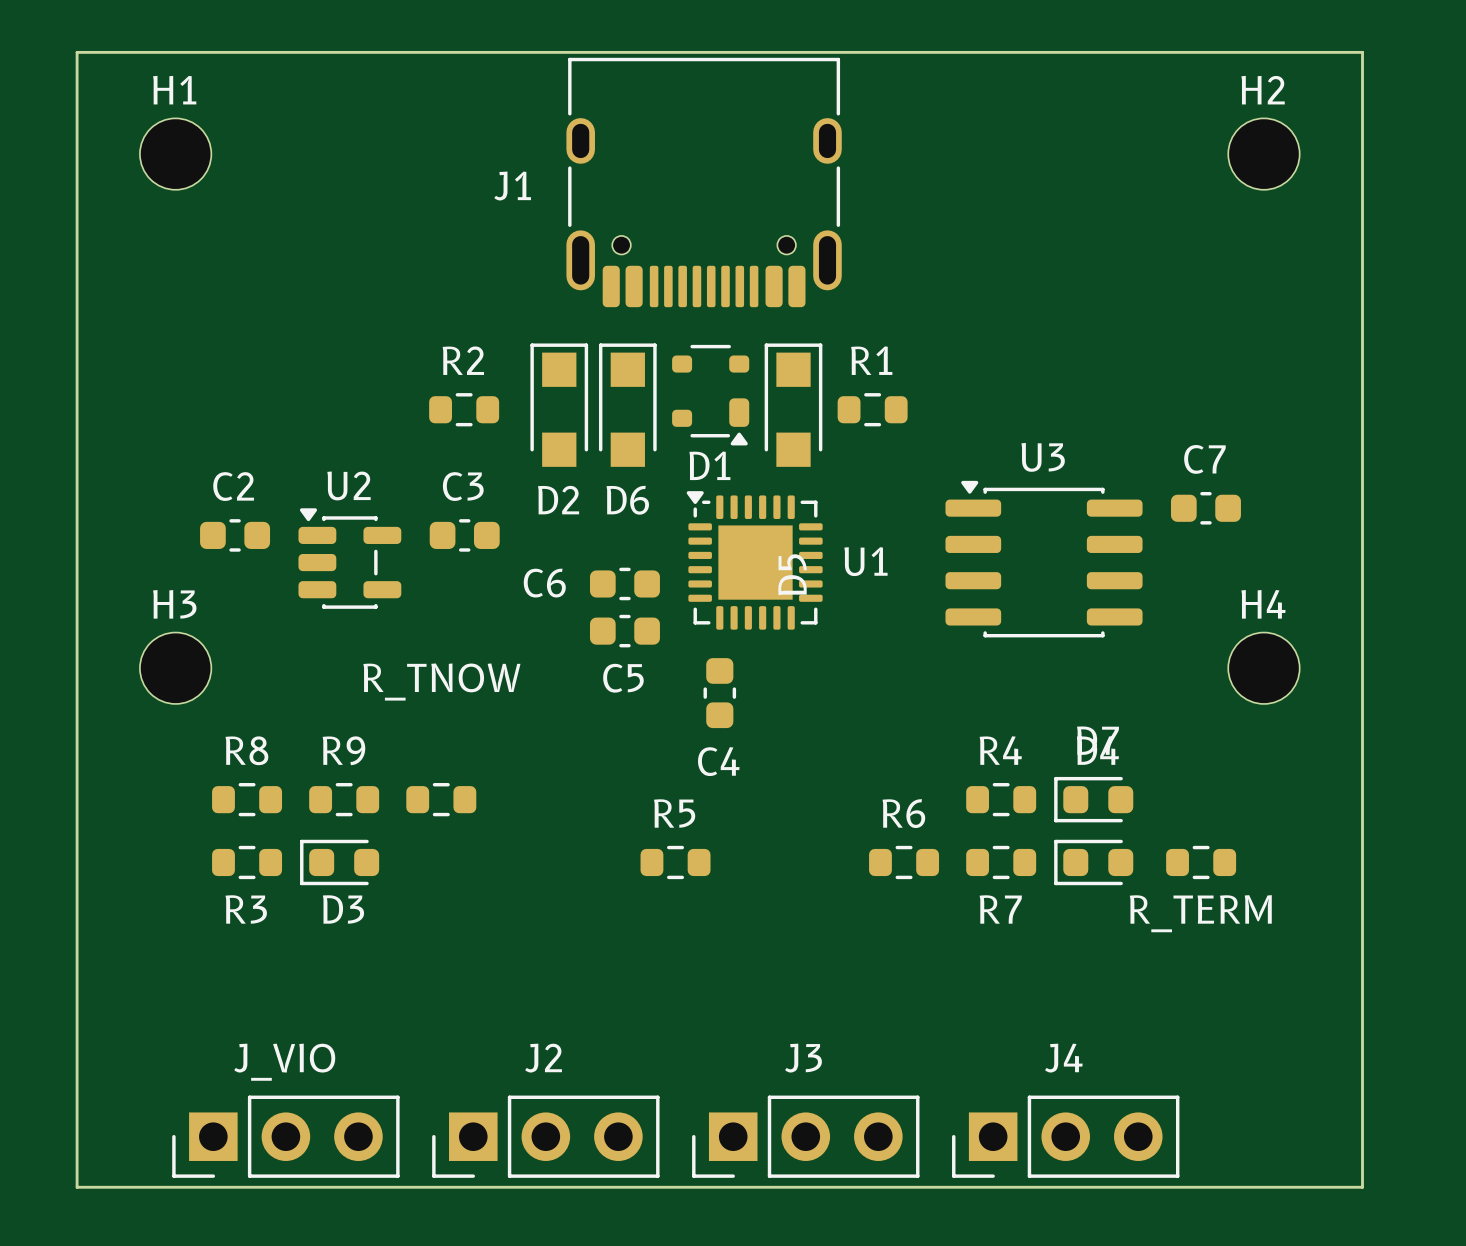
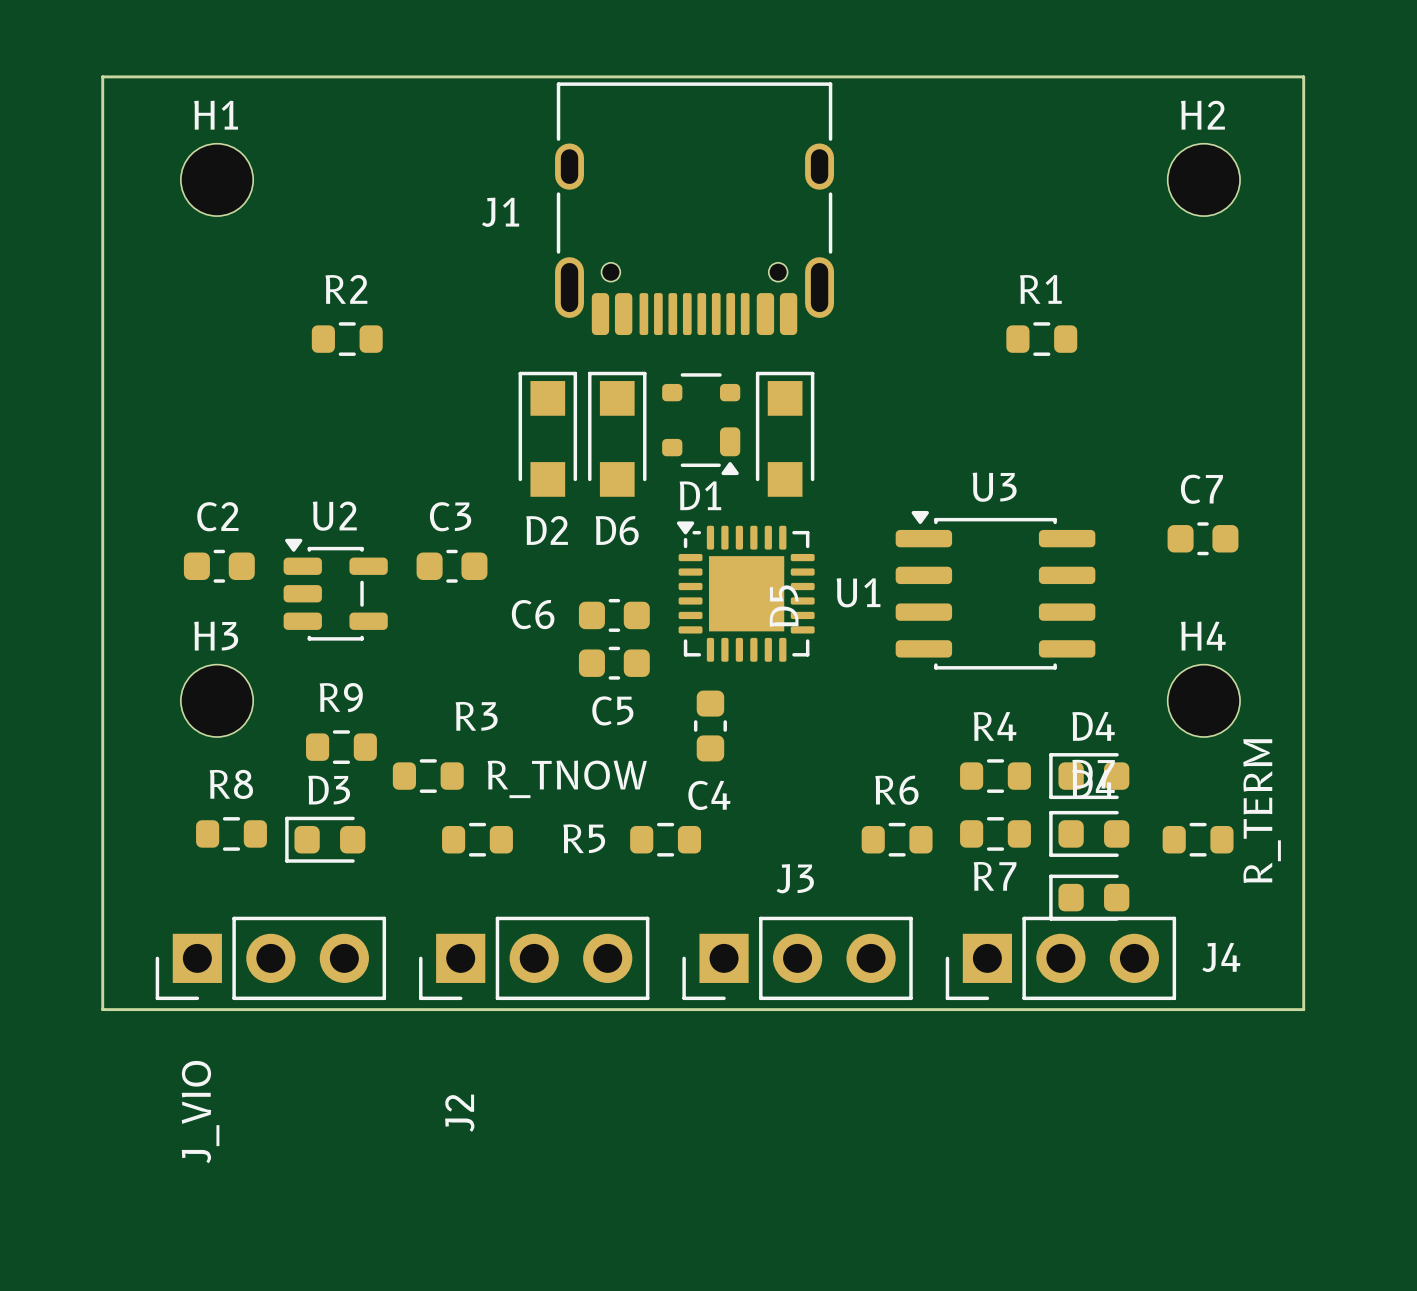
board edge: (119, 52) (77, 52) (77, 1187) (1362, 1187) (1362, 52) (1305, 52) -> (102, 76) (102, 1009) (1303, 1009) (1303, 76)
H1 position: (175, 154) -> (217, 179)
H2 position: (1263, 154) -> (1203, 179)
R2 position: (464, 409) -> (347, 339)
R1 position: (872, 409) -> (1041, 339)
U3 position: (1044, 559) -> (995, 590)
H3 position: (175, 668) -> (217, 700)
H4 position: (1263, 668) -> (1203, 700)
R_TNOW name position: R_TNOW (441, 682) -> R_TNOW (567, 779)
R4: none -> (995, 776)
D4: none -> (1089, 776)
R4 name: R4 (1000, 750) -> R7 (995, 876)
R9 position: (344, 799) -> (341, 747)
R_TNOW position: (441, 799) -> (428, 776)
R5 name position: R5 (674, 813) -> R5 (584, 838)
R3 position: (247, 862) -> (477, 839)
D3 position: (339, 862) -> (325, 839)
R5 position: (675, 862) -> (665, 839)
R6 position: (904, 862) -> (897, 839)
R7: (1001, 862) -> none
R_TERM position: (1201, 862) -> (1198, 839)
R3 name position: R3 (246, 909) -> R3 (476, 716)
D3 name position: D3 (343, 909) -> D3 (329, 790)
R_TERM name rotation: 0° (1200, 913) -> 90° counterclockwise (1262, 811)
J2 name rotation: 0° (543, 1058) -> 90° counterclockwise (459, 1113)
J2 name position: J2 (543, 1058) -> J2 (459, 1113)
J4 name position: J4 (1063, 1058) -> J4 (1221, 957)
J_VIO name rotation: 0° (284, 1062) -> 90° counterclockwise (200, 1112)
J_VIO position: (285, 1136) -> (270, 958)
J2 position: (545, 1136) -> (534, 958)
J3 position: (805, 1136) -> (797, 958)
J4 position: (1065, 1136) -> (1060, 958)

